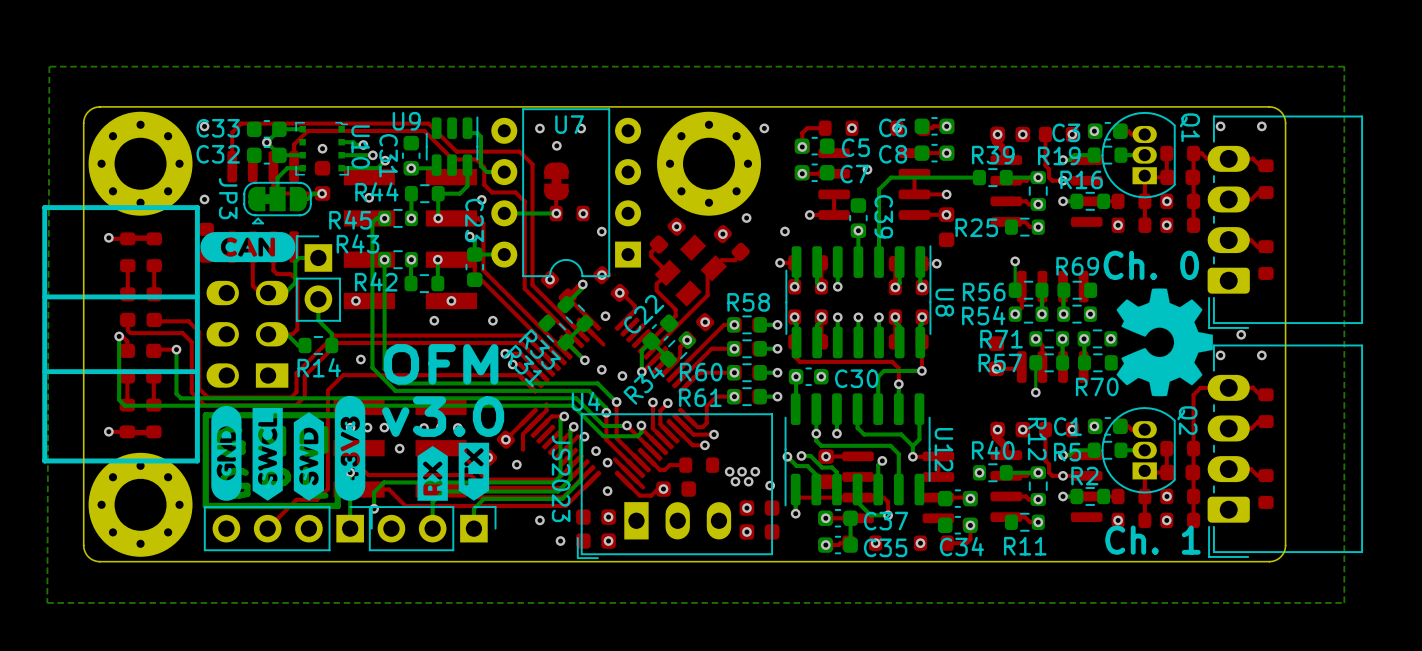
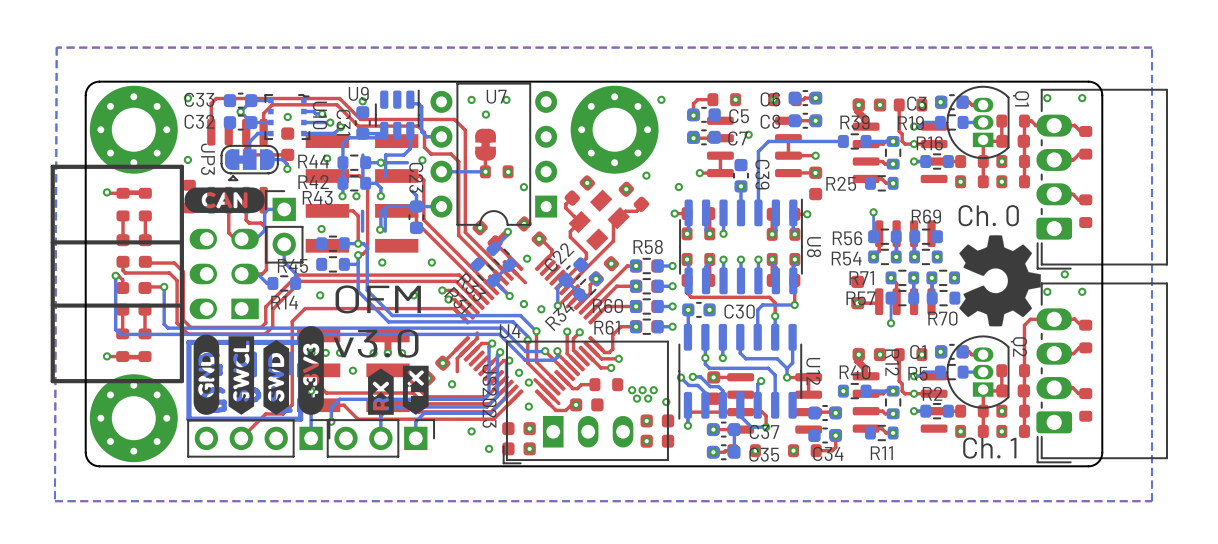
top track: (237, 126) (241, 123) (428, 123) (456, 151) -> (216, 98) (339, 98) (360, 119) (401, 119)
via: none -> (362, 101)
top track: (304, 134) (307, 130) (424, 130) (452, 159) -> (272, 104) (336, 104) (358, 126) (397, 126)
via: (411, 168) -> none
bottom track: none -> (384, 135) (381, 137) (348, 137) (342, 143) (342, 196)
bottom track: (322, 193) (313, 193) (307, 199) -> (287, 169) (287, 164) (282, 159) (275, 159)
via position: (322, 193) -> (287, 169)
R44 position: (424, 193) -> (354, 162)
via: none -> (380, 162)
bottom track: none -> (407, 162) (365, 162)
top track: none -> (327, 175) (359, 175) (367, 184) (367, 249) (362, 254) (358, 255)
bottom track: (384, 218) (376, 218) (372, 222) (372, 367) (395, 390) (441, 390) -> (358, 255) (358, 291) (388, 321)
via: (384, 218) -> none
R45 position: (398, 218) -> (332, 264)
via: (411, 218) -> none
via: (438, 218) -> none
bottom track: none -> (365, 183) (376, 183) (380, 187) (380, 196)
via: (469, 236) -> none
via: none -> (342, 196)
via: none -> (356, 196)
via: none -> (380, 196)
bottom track: none -> (409, 206) (386, 206) (380, 212) (380, 229)
top track: none -> (327, 210) (352, 210) (358, 216) (358, 243)
bottom track: (384, 259) (384, 369) (398, 383) (446, 383) -> (344, 243) (363, 243) (367, 247) (367, 290) (392, 315)
via: (384, 259) -> none
R43 position: (398, 259) -> (332, 243)
via: (411, 259) -> none
via: (437, 259) -> none
via: none -> (321, 229)
via: none -> (380, 229)
R42 position: (424, 283) -> (354, 183)
via: none -> (358, 243)
via: (355, 300) -> none
via: (451, 300) -> none
via: none -> (358, 255)
bottom track: none -> (358, 263) (346, 264)

